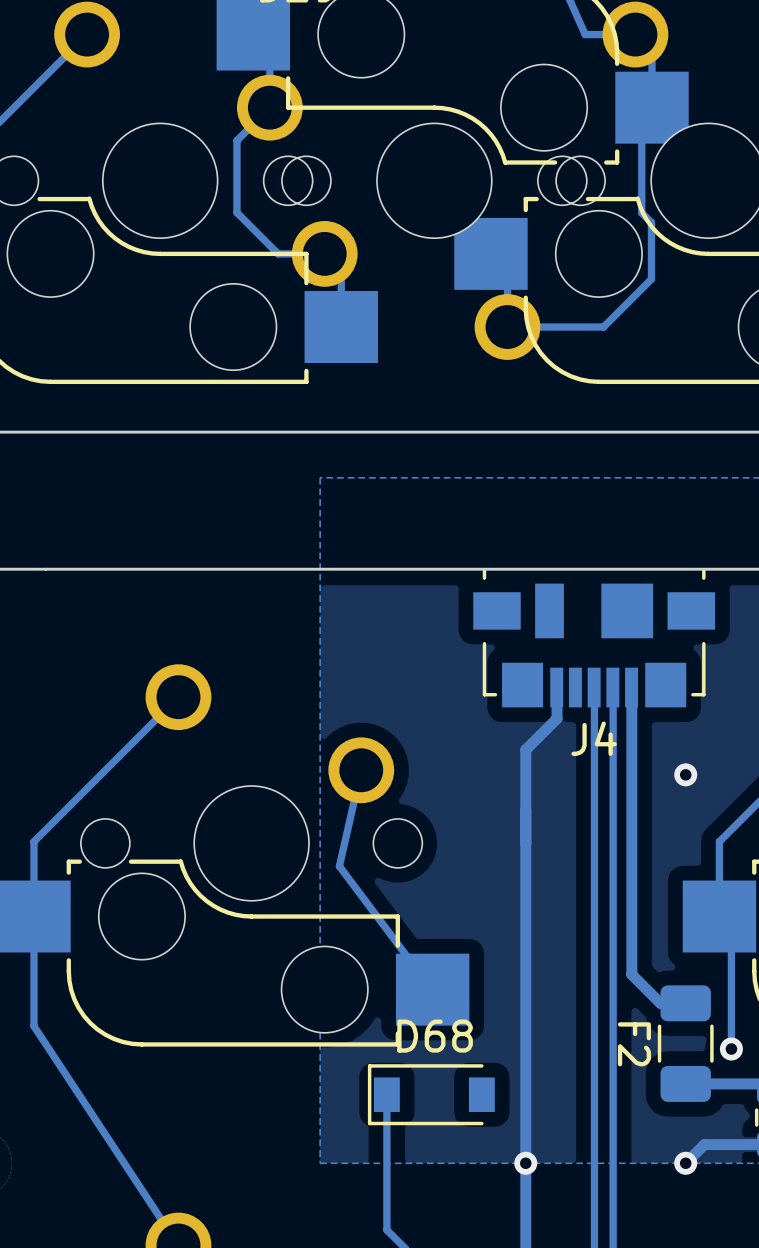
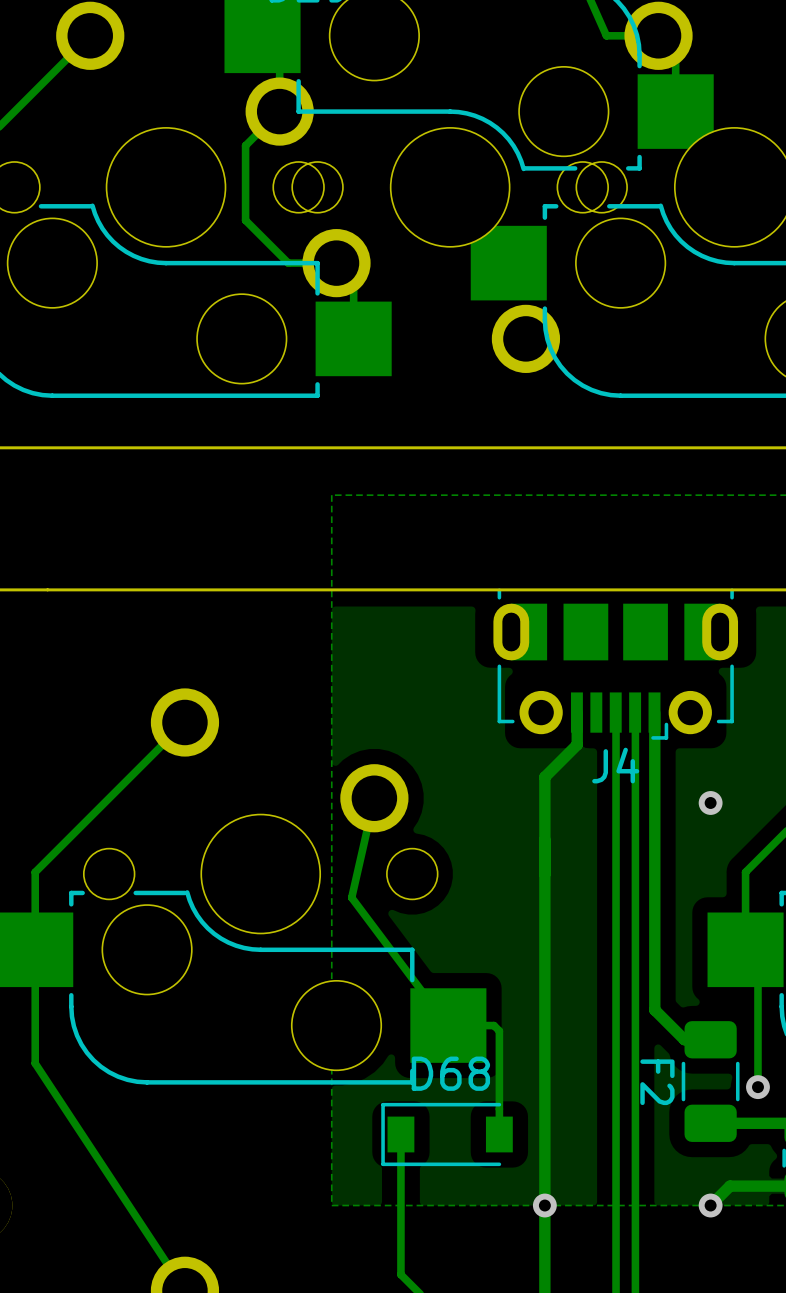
track: (652, 107) (641, 117) (641, 212) (651, 222) (651, 279) (603, 327) (507, 327) (507, 270) (490, 253) (501, 243) -> none
J4 footprint: [473, 568, 716, 708] -> [493, 588, 739, 740]
track: none -> (448, 1025) (493, 1025) (499, 1030) (499, 1134)

